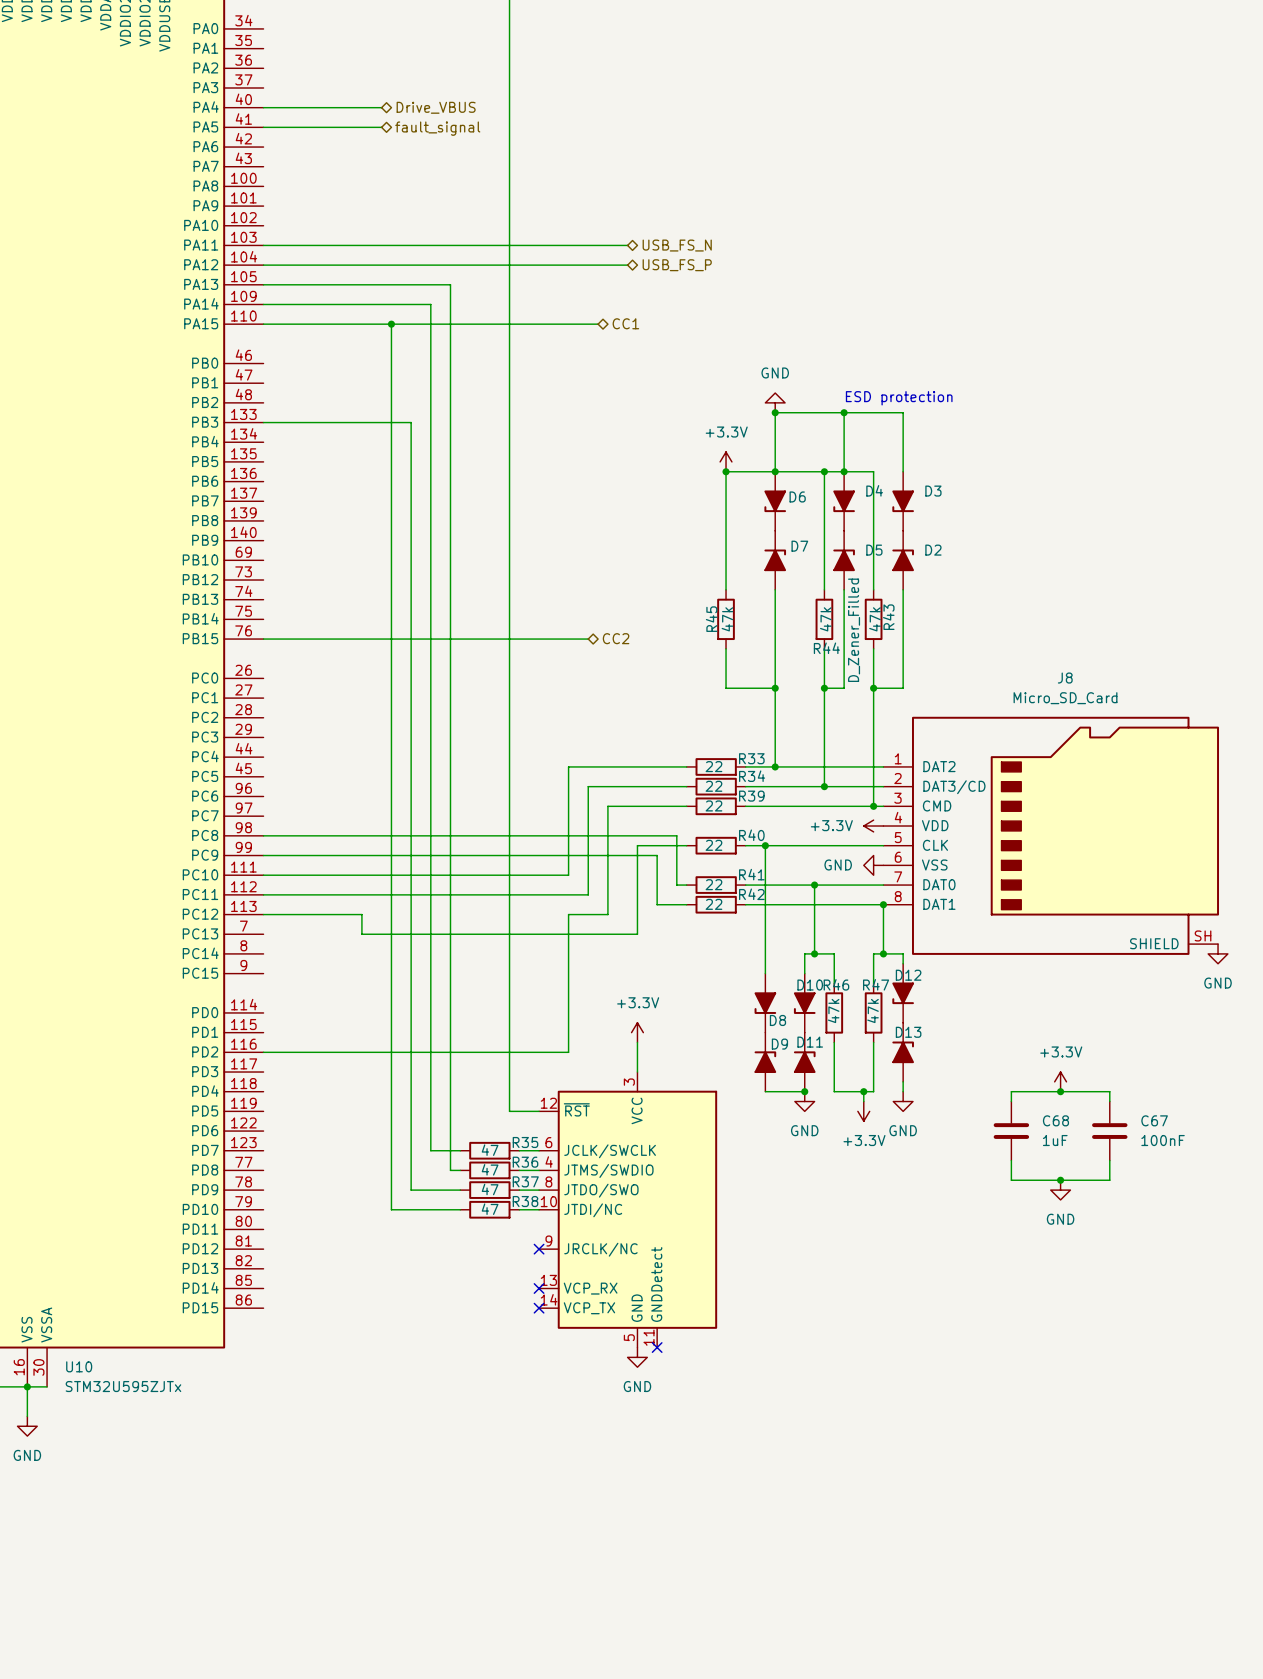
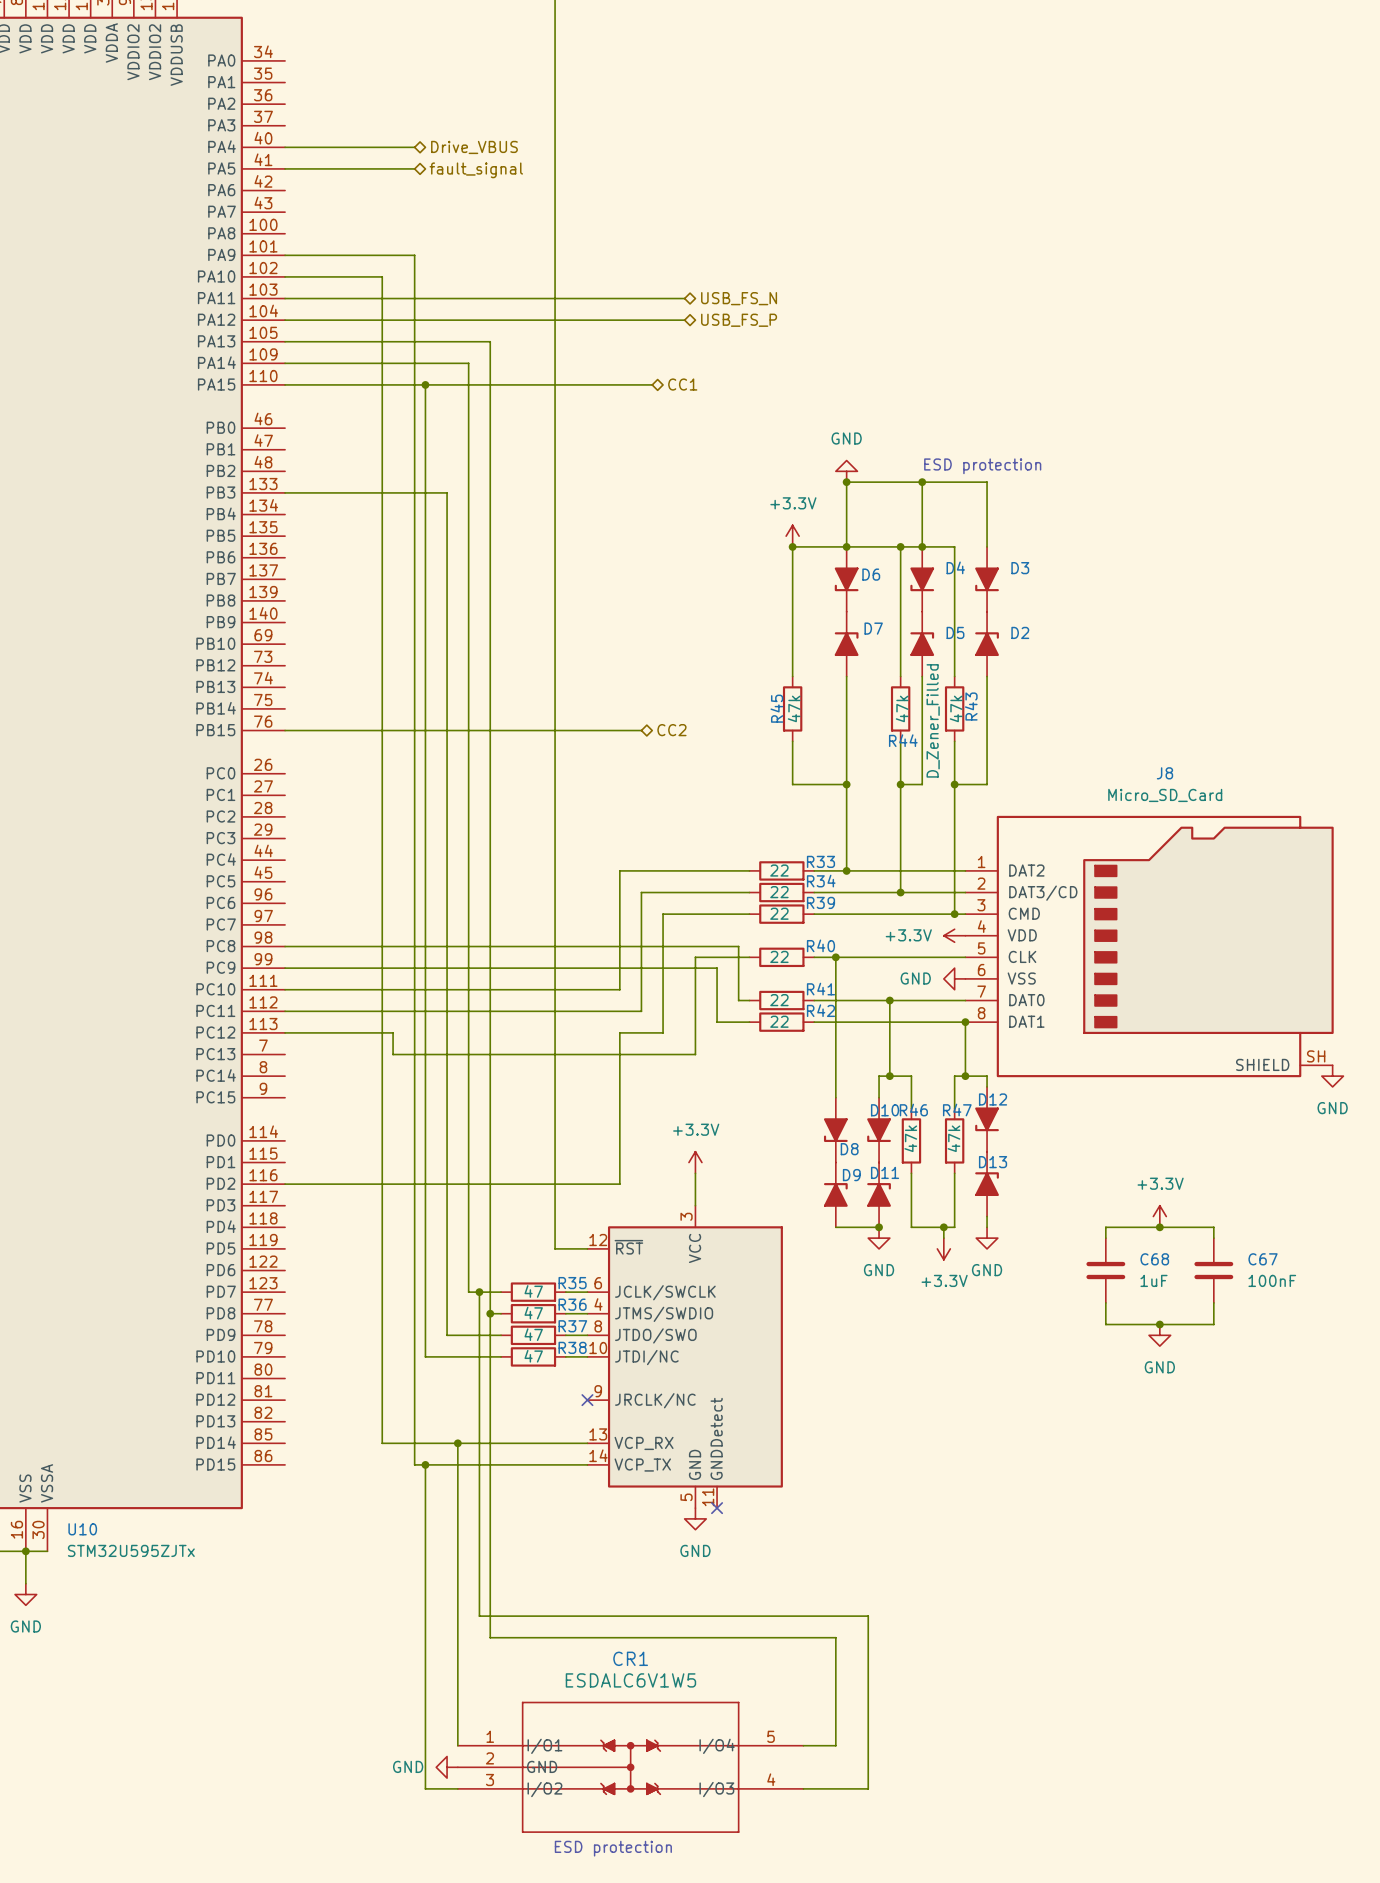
wire: none -> (285, 255) (414, 255) (414, 1464) (587, 1464)
wire: none -> (285, 276) (382, 276) (382, 1443) (587, 1443)
wire: none -> (479, 1292) (479, 1616) (868, 1616) (868, 1788) (803, 1788)
junction: none -> (479, 1292)
wire: none -> (490, 1313) (490, 1637) (835, 1637) (835, 1745) (803, 1745)
junction: none -> (490, 1313)
wire: none -> (457, 1443) (457, 1745)
junction: none -> (457, 1443)
no-connect mark: (539, 1288) -> none
wire: none -> (425, 1464) (425, 1788) (457, 1788)
junction: none -> (425, 1464)
no-connect mark: (539, 1308) -> none
power symbol: none -> GND (447, 1767)
CR1: none -> ESDALC6V1W5 (630, 1767)
text: none -> ESD protection (613, 1848)

